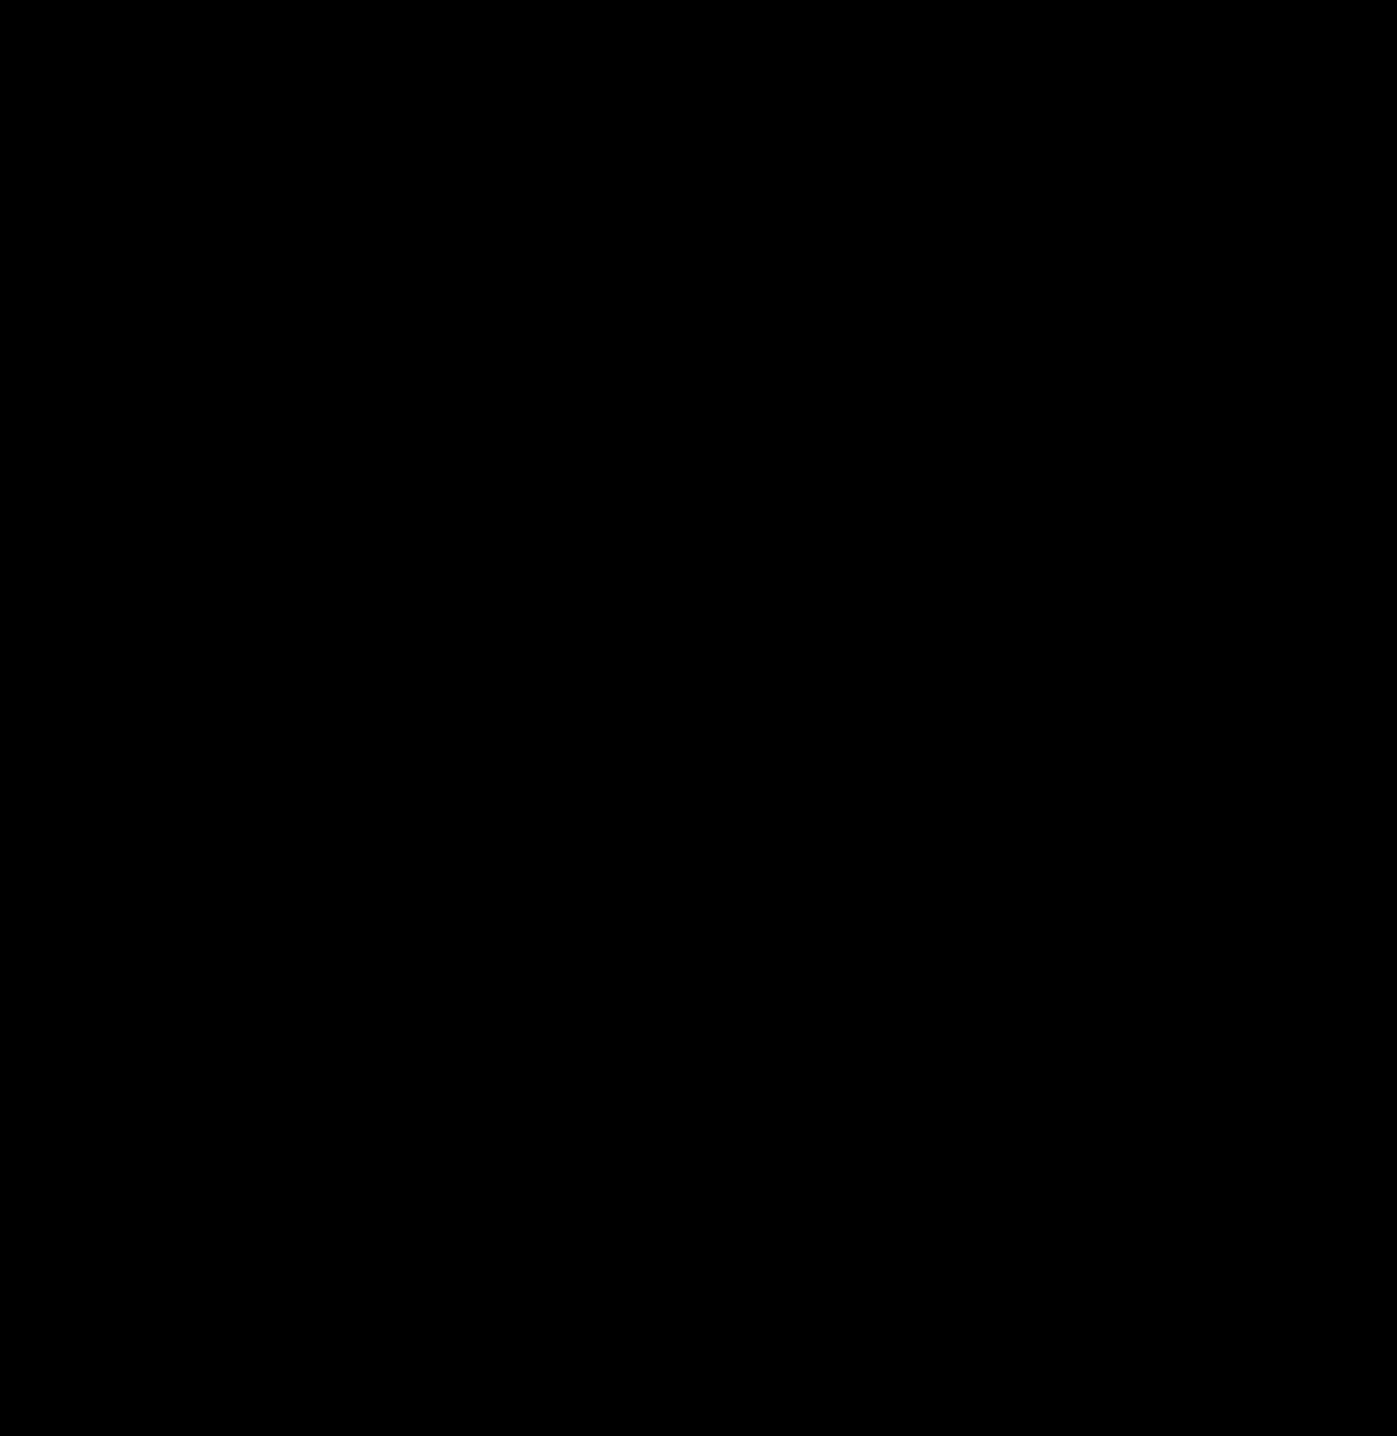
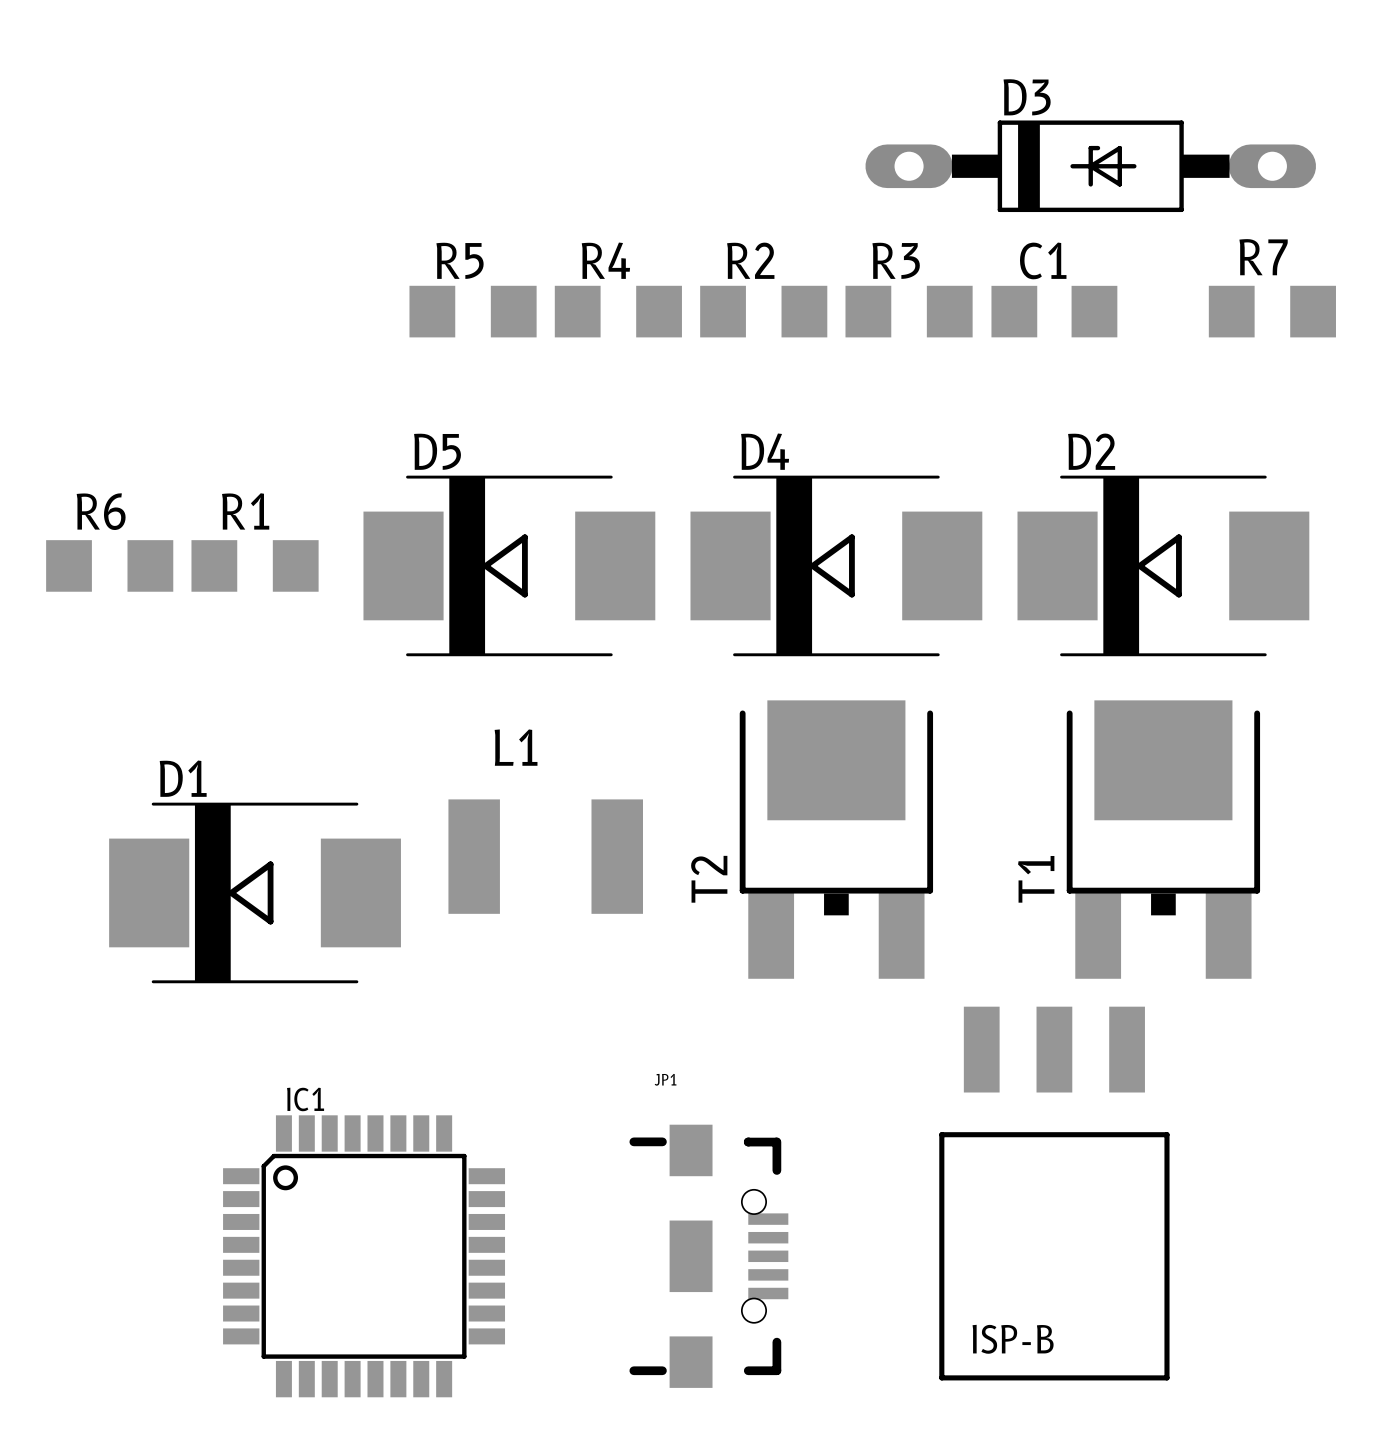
D3: none -> (1090, 166)
R5: none -> (473, 311)
R4: none -> (618, 311)
R2: none -> (763, 311)
R3: none -> (909, 311)
C1: none -> (1054, 311)
R7: none -> (1272, 311)
R6: none -> (109, 565)
R1: none -> (255, 565)
D5: none -> (509, 565)
D4: none -> (836, 565)
D2: none -> (1163, 565)
T2: none -> (836, 839)
T1: none -> (1163, 839)
L1: none -> (545, 856)
D1: none -> (255, 892)
ISP-B: none -> (1054, 1193)
IC1: none -> (364, 1256)
JP1: none -> (708, 1256)

